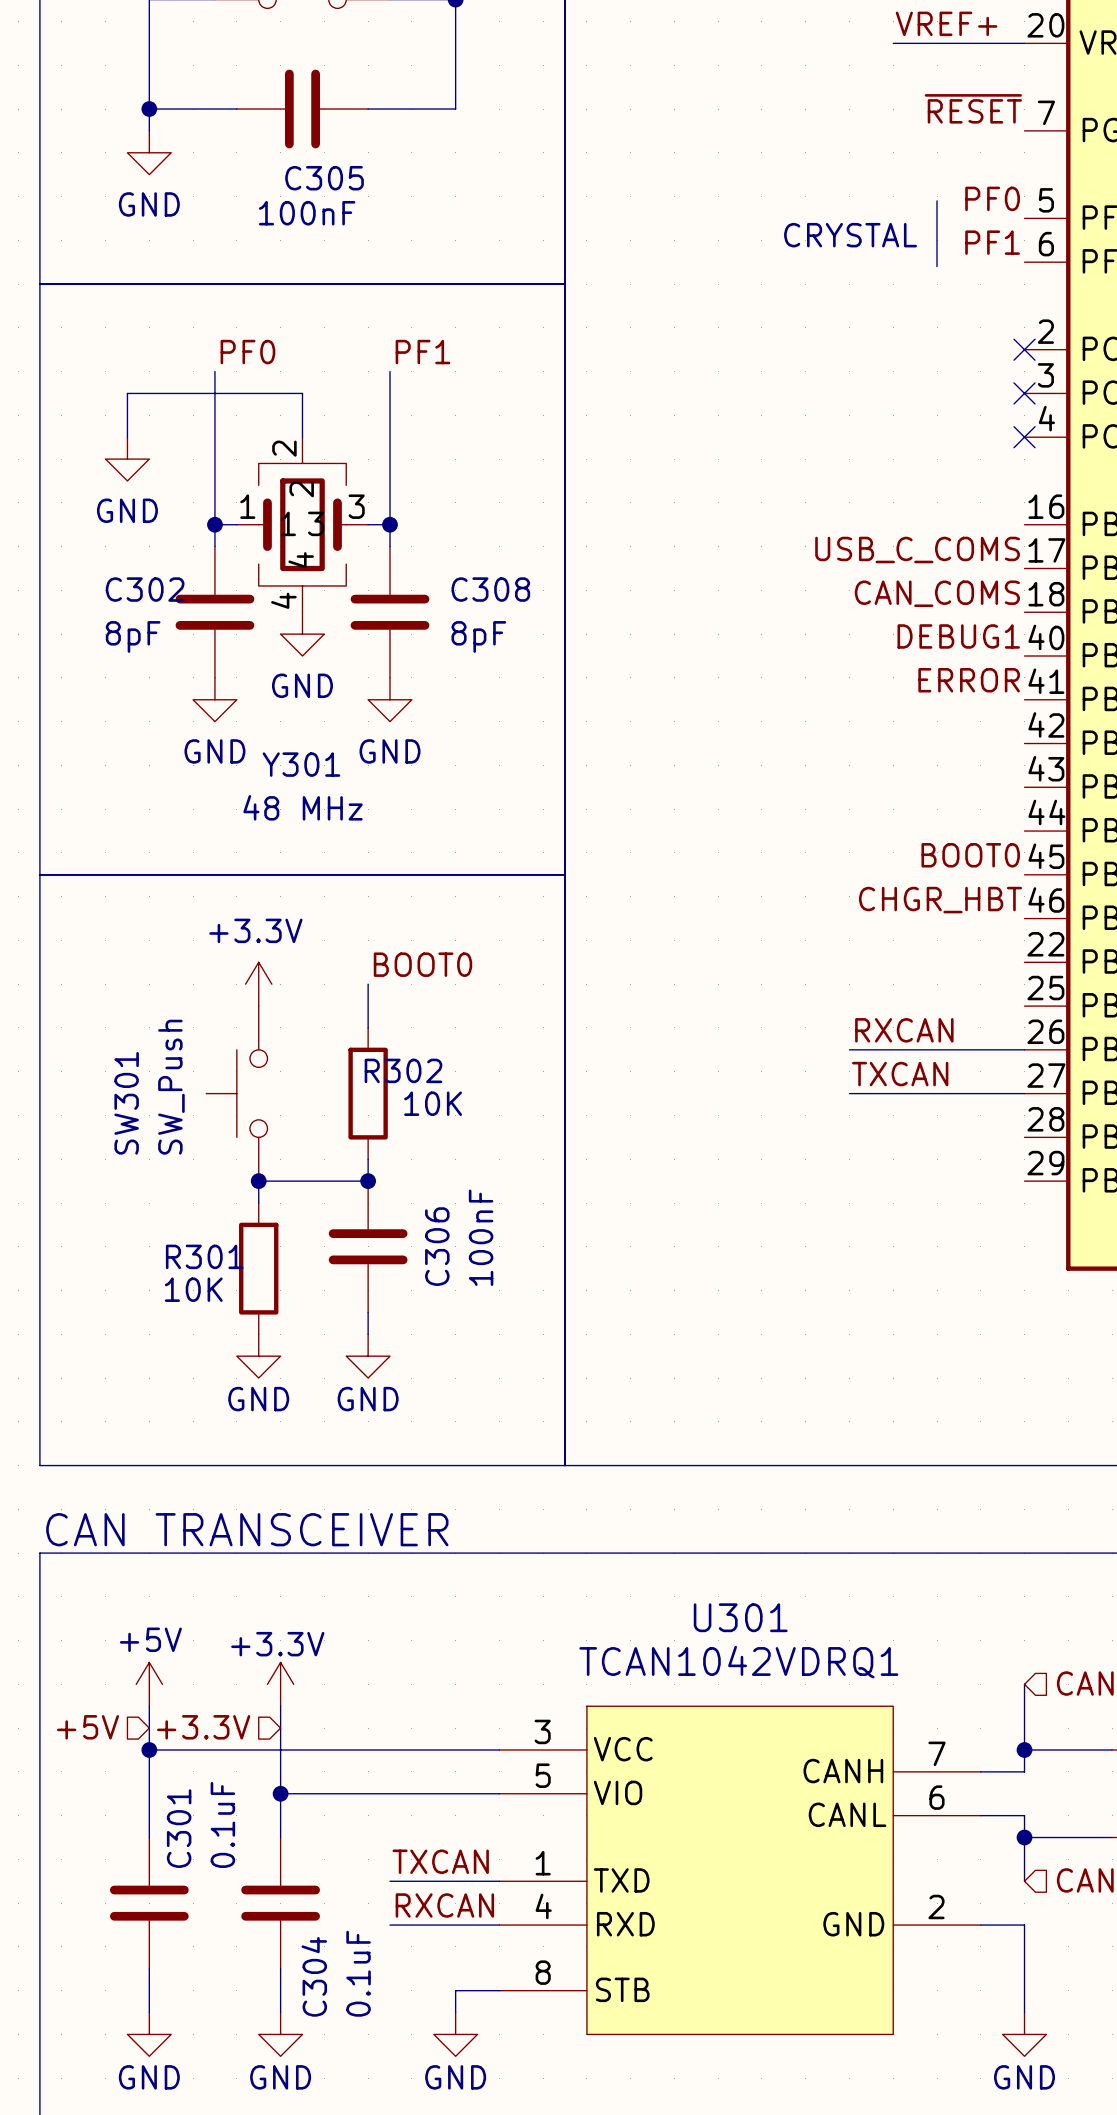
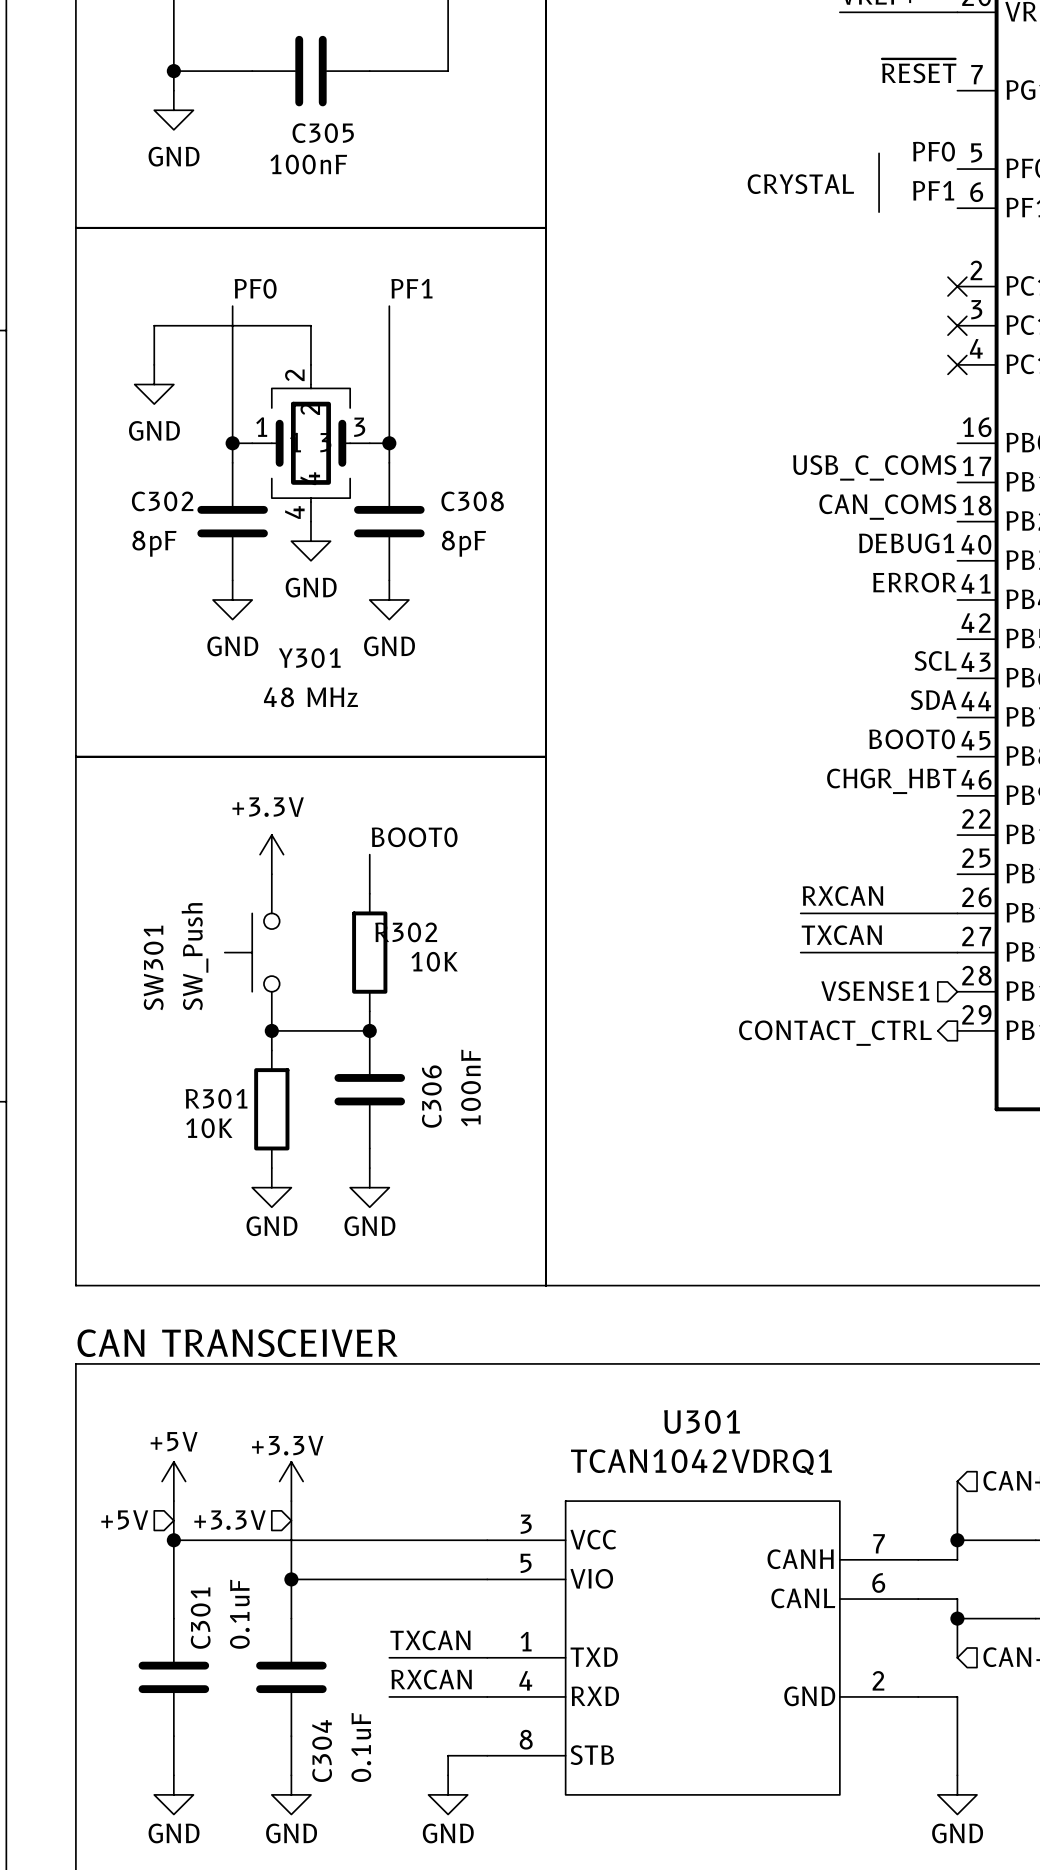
label: none -> SCL (935, 660)
label: none -> SDA (933, 700)
hierarchical label: none -> VSENSE1 (875, 991)
hierarchical label: none -> CONTACT_CTRL (835, 1033)

